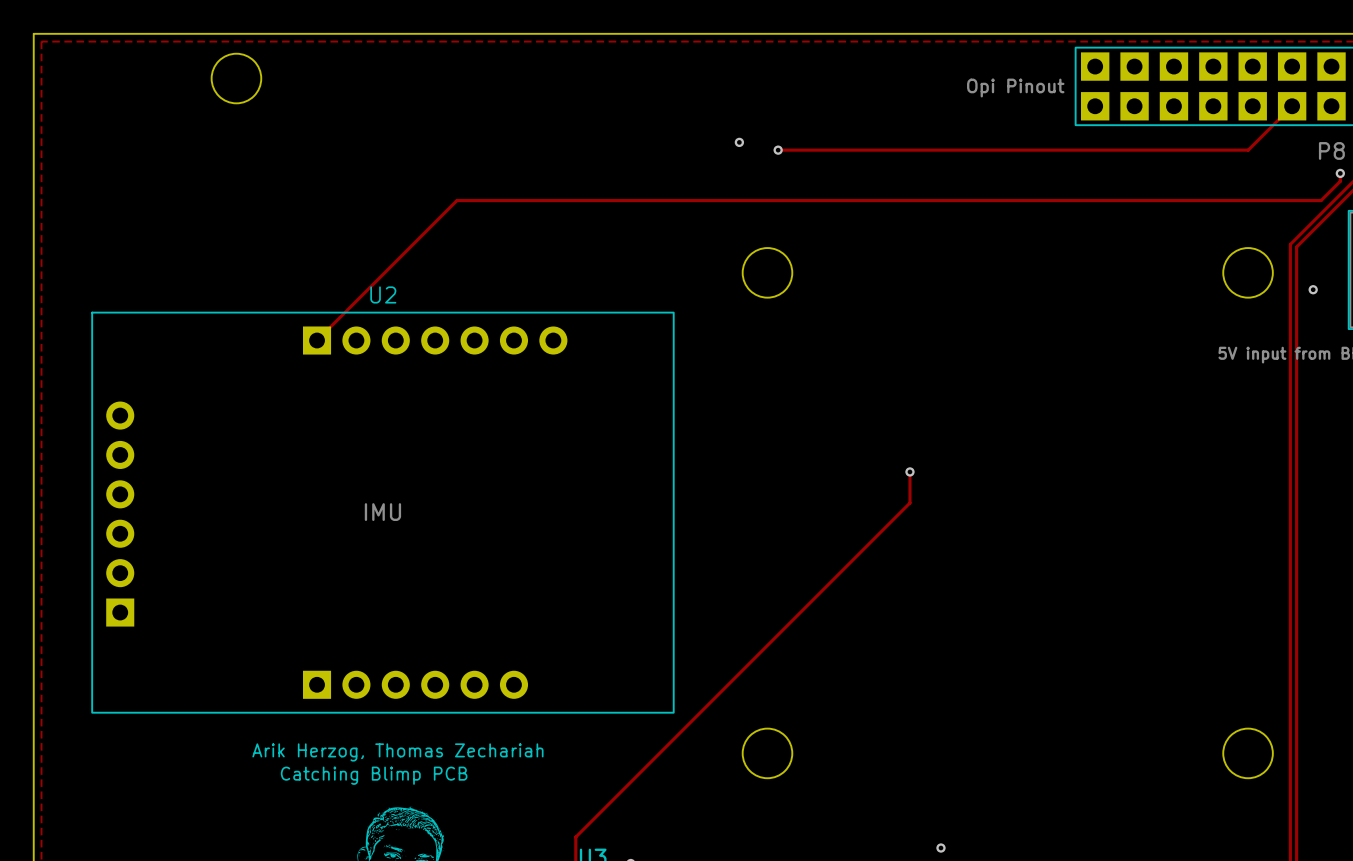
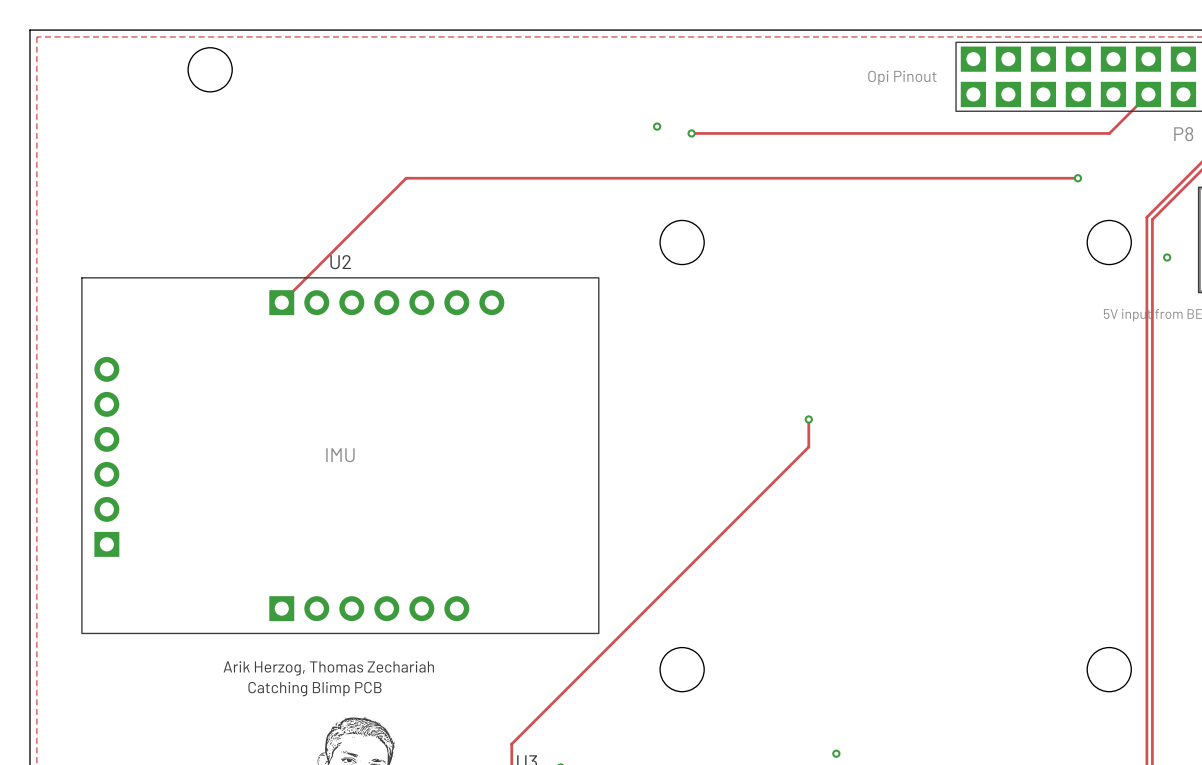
track: (1340, 173) (1340, 181) (1321, 200) (1212, 200) -> none
via: (1340, 173) -> none
via: none -> (1077, 178)

